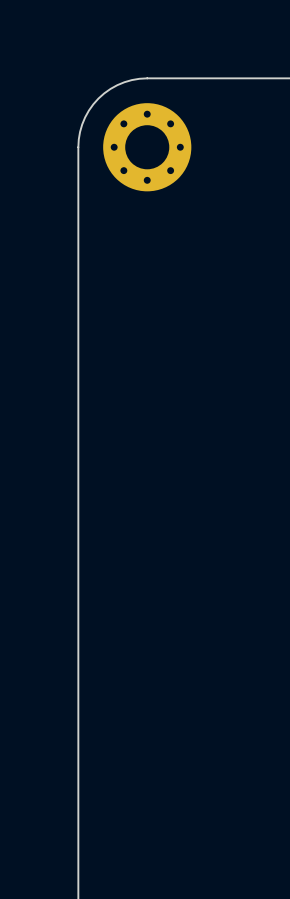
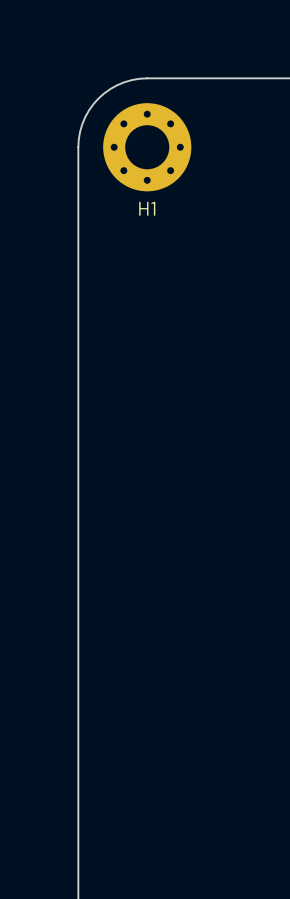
H1 name: none -> H1 (147, 208)

